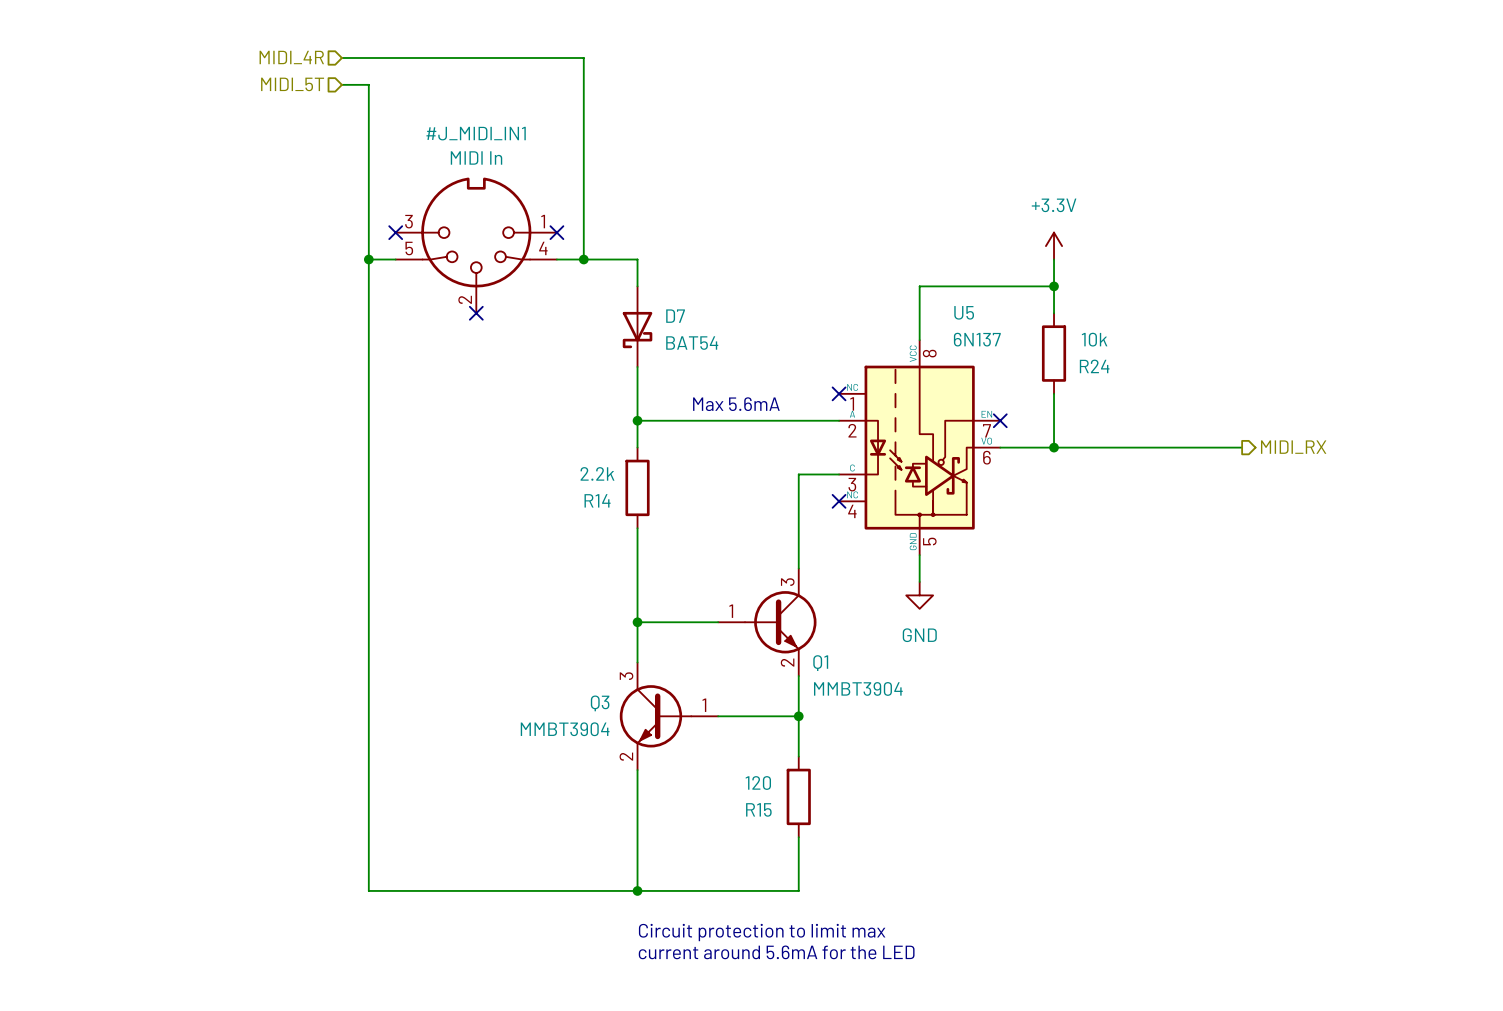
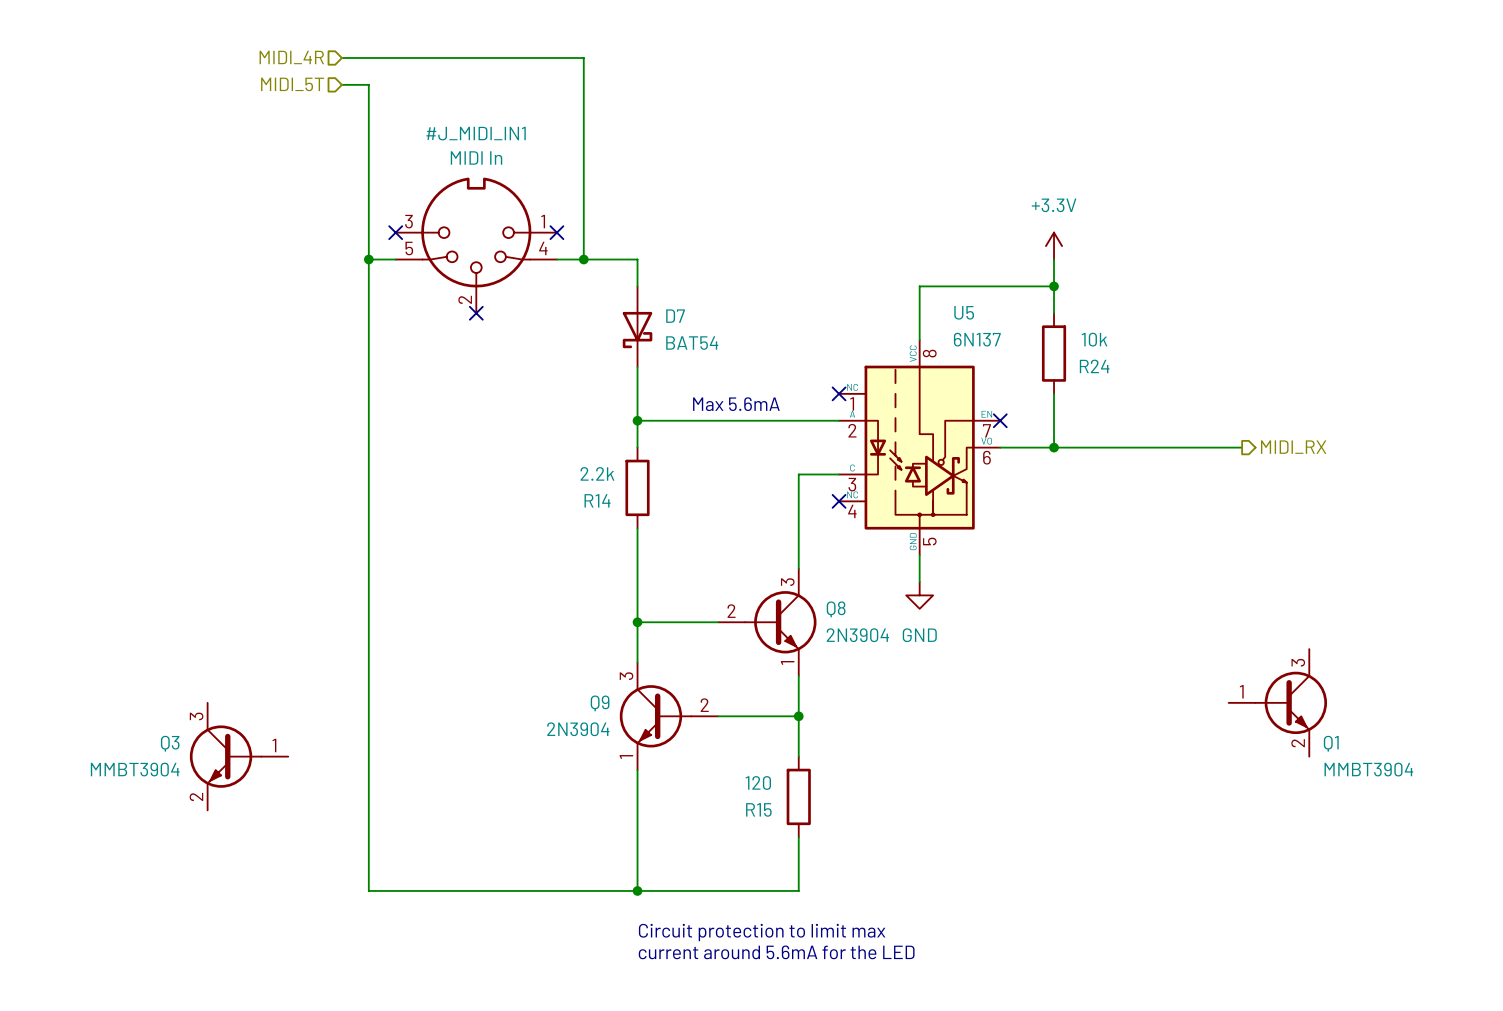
Q1 position: (767, 622) -> (1277, 702)
Q8: none -> 2N3904 (767, 622)
Q3 position: (668, 716) -> (239, 756)
Q9: none -> 2N3904 (668, 716)

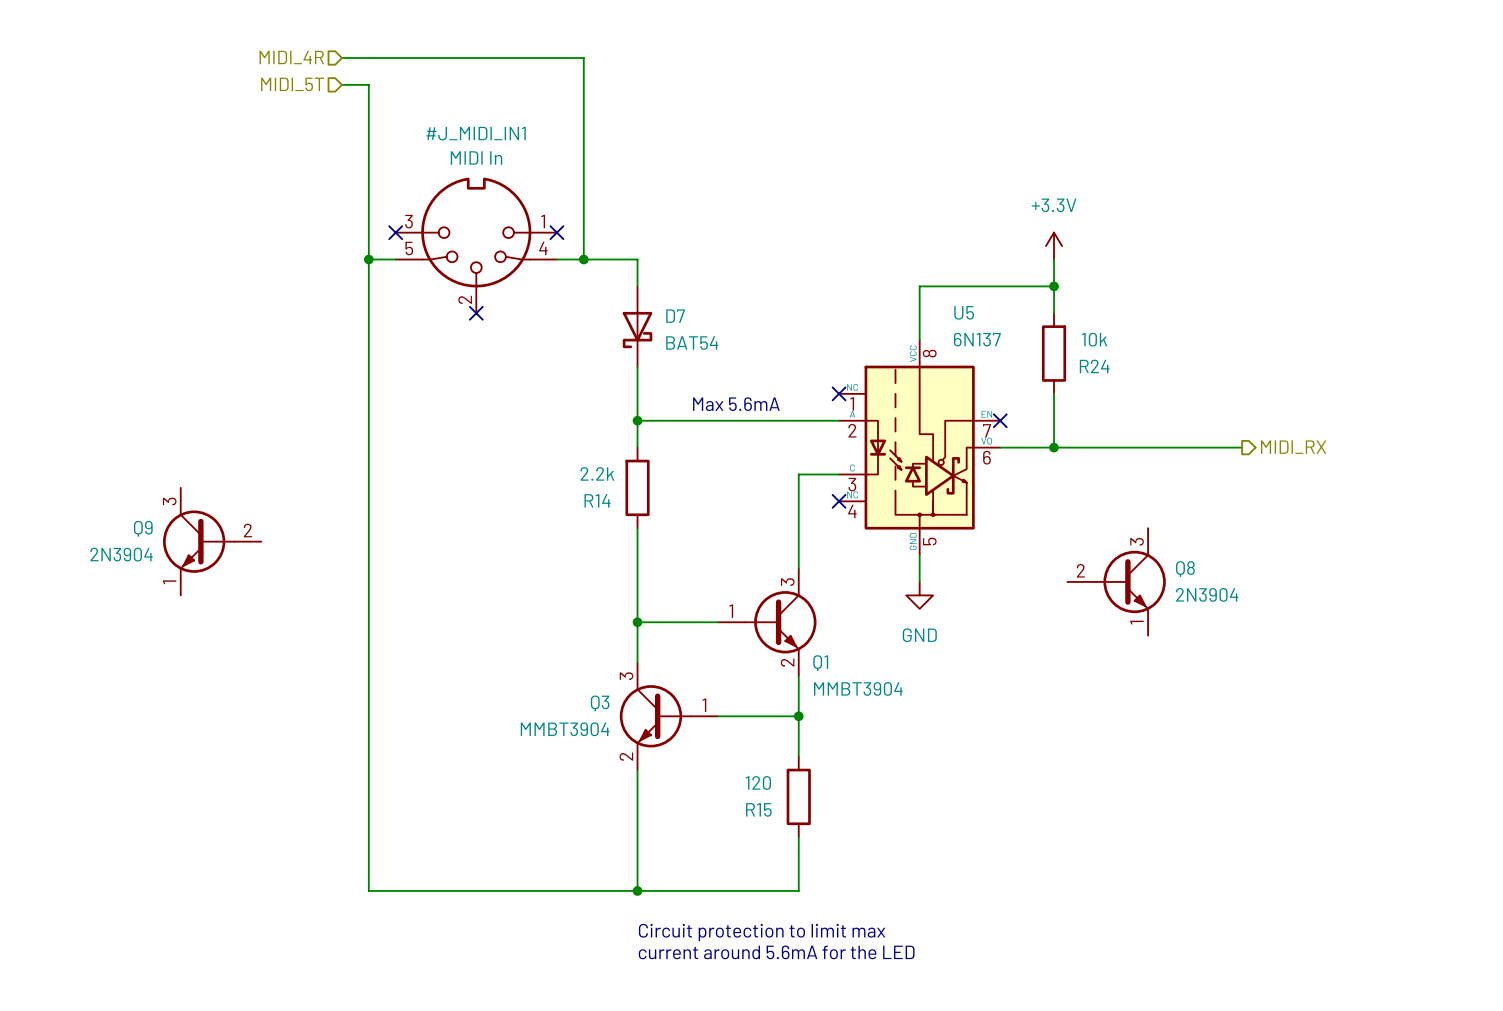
Q8 position: (767, 622) -> (1116, 581)
Q1 position: (1277, 702) -> (767, 622)
Q9 position: (668, 716) -> (212, 541)
Q3 position: (239, 756) -> (668, 716)

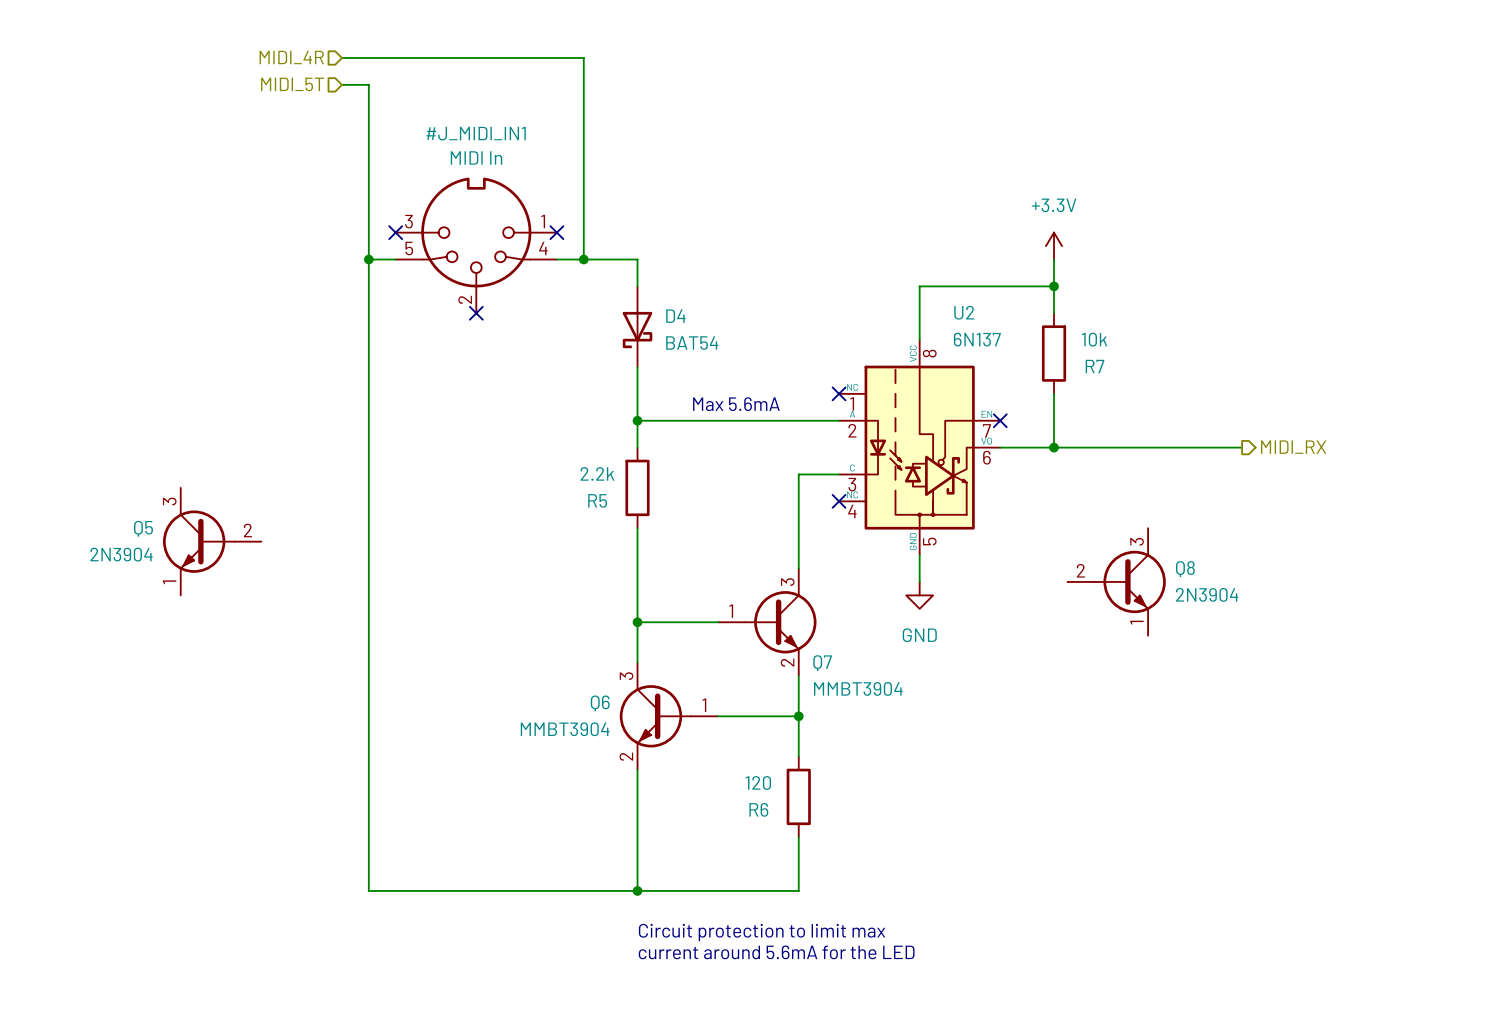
U5 name: U5 (964, 312) -> U2 (964, 312)
D7 name: D7 (675, 316) -> D4 (675, 316)
R24 name: R24 (1094, 366) -> R7 (1095, 366)
R14 name: R14 (597, 500) -> R5 (597, 500)
Q9 name: Q9 (143, 528) -> Q5 (143, 528)
Q1 name: Q1 (820, 663) -> Q7 (822, 663)
Q3 name: Q3 (600, 703) -> Q6 (600, 703)
R15 name: R15 (758, 809) -> R6 (758, 809)

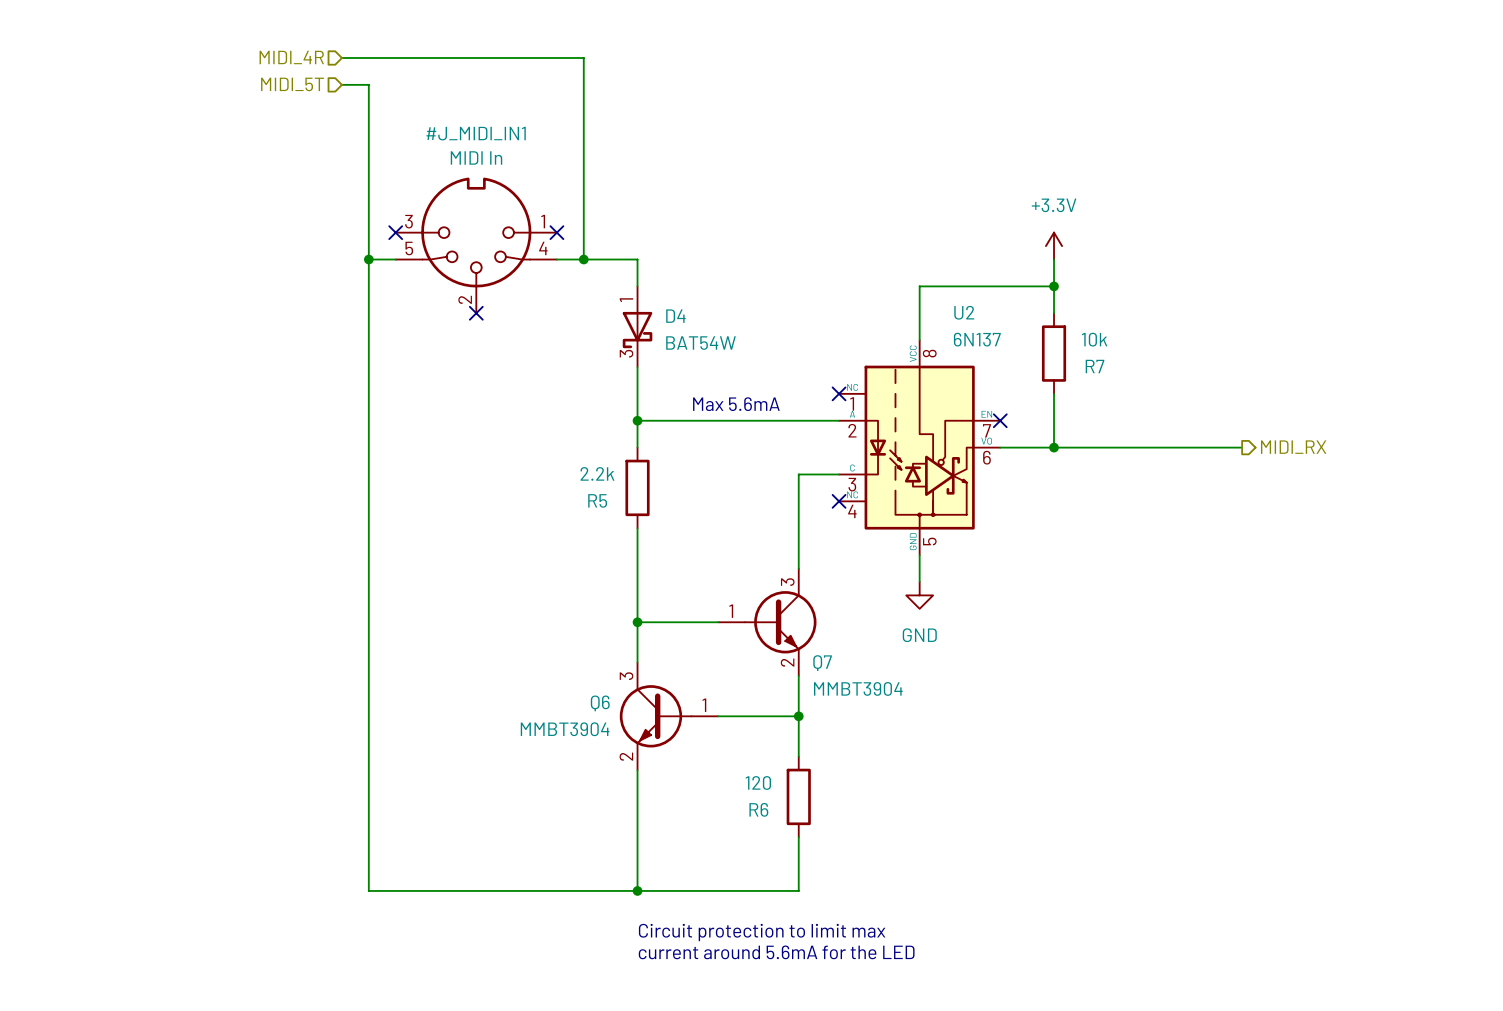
D4 pin number: none -> 1 (626, 300)
D4 value: BAT54 (692, 343) -> BAT54W (700, 343)
D4 pin number: none -> 3 (626, 353)
Q5: 2N3904 (212, 541) -> none
Q8: 2N3904 (1116, 581) -> none

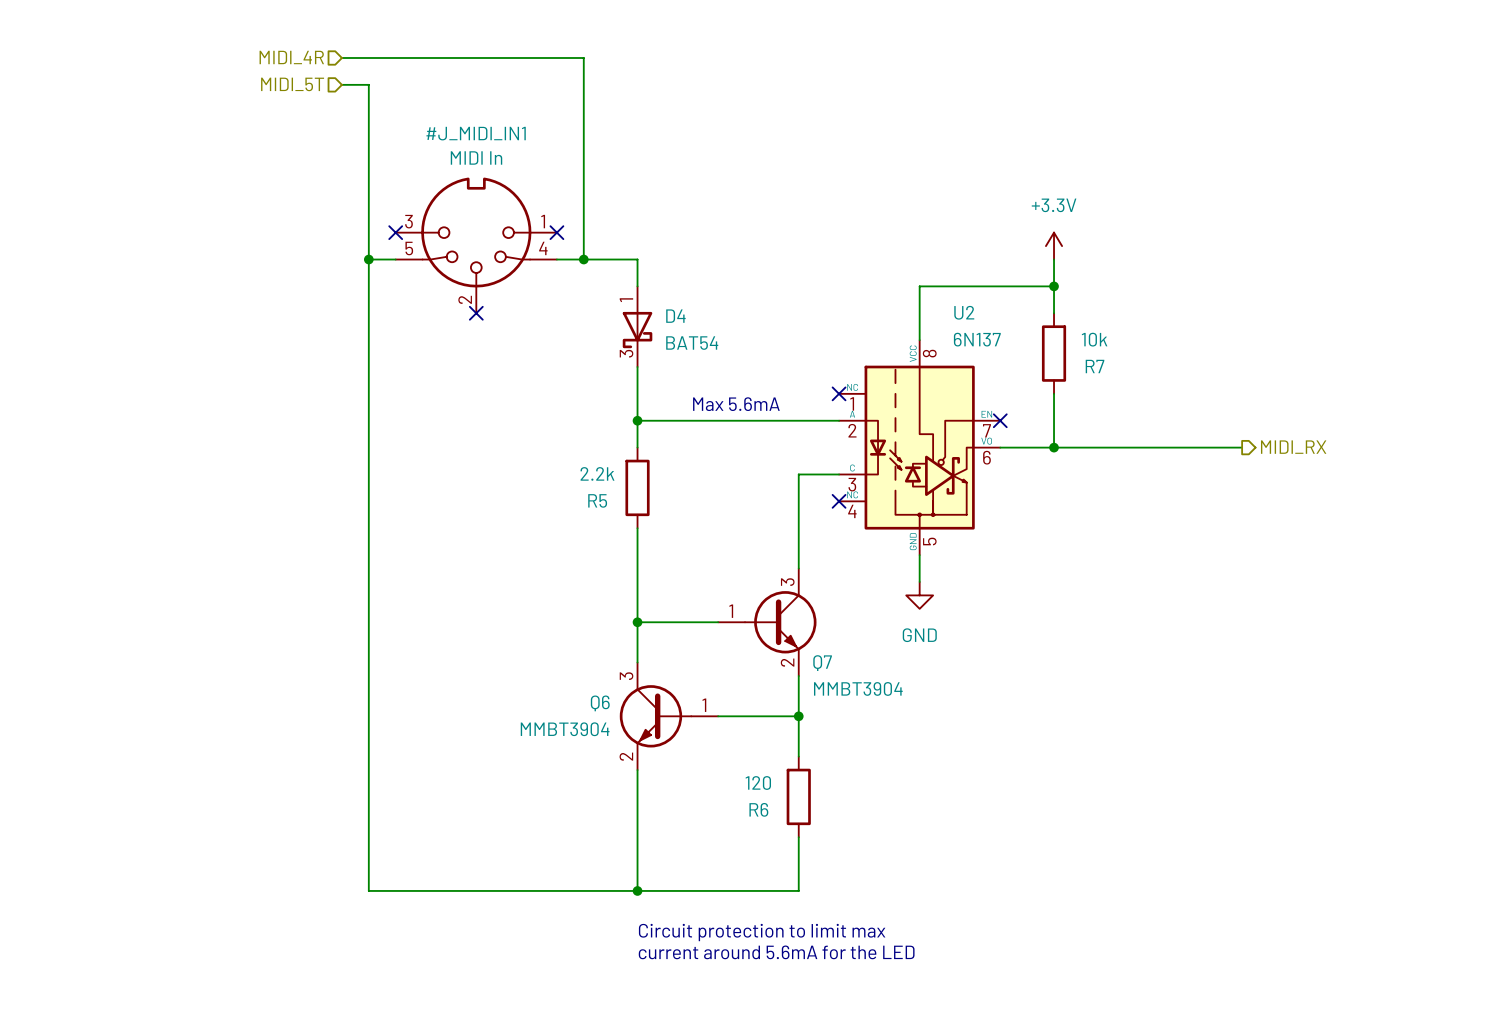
D4 value: BAT54W (700, 343) -> BAT54 (692, 343)

